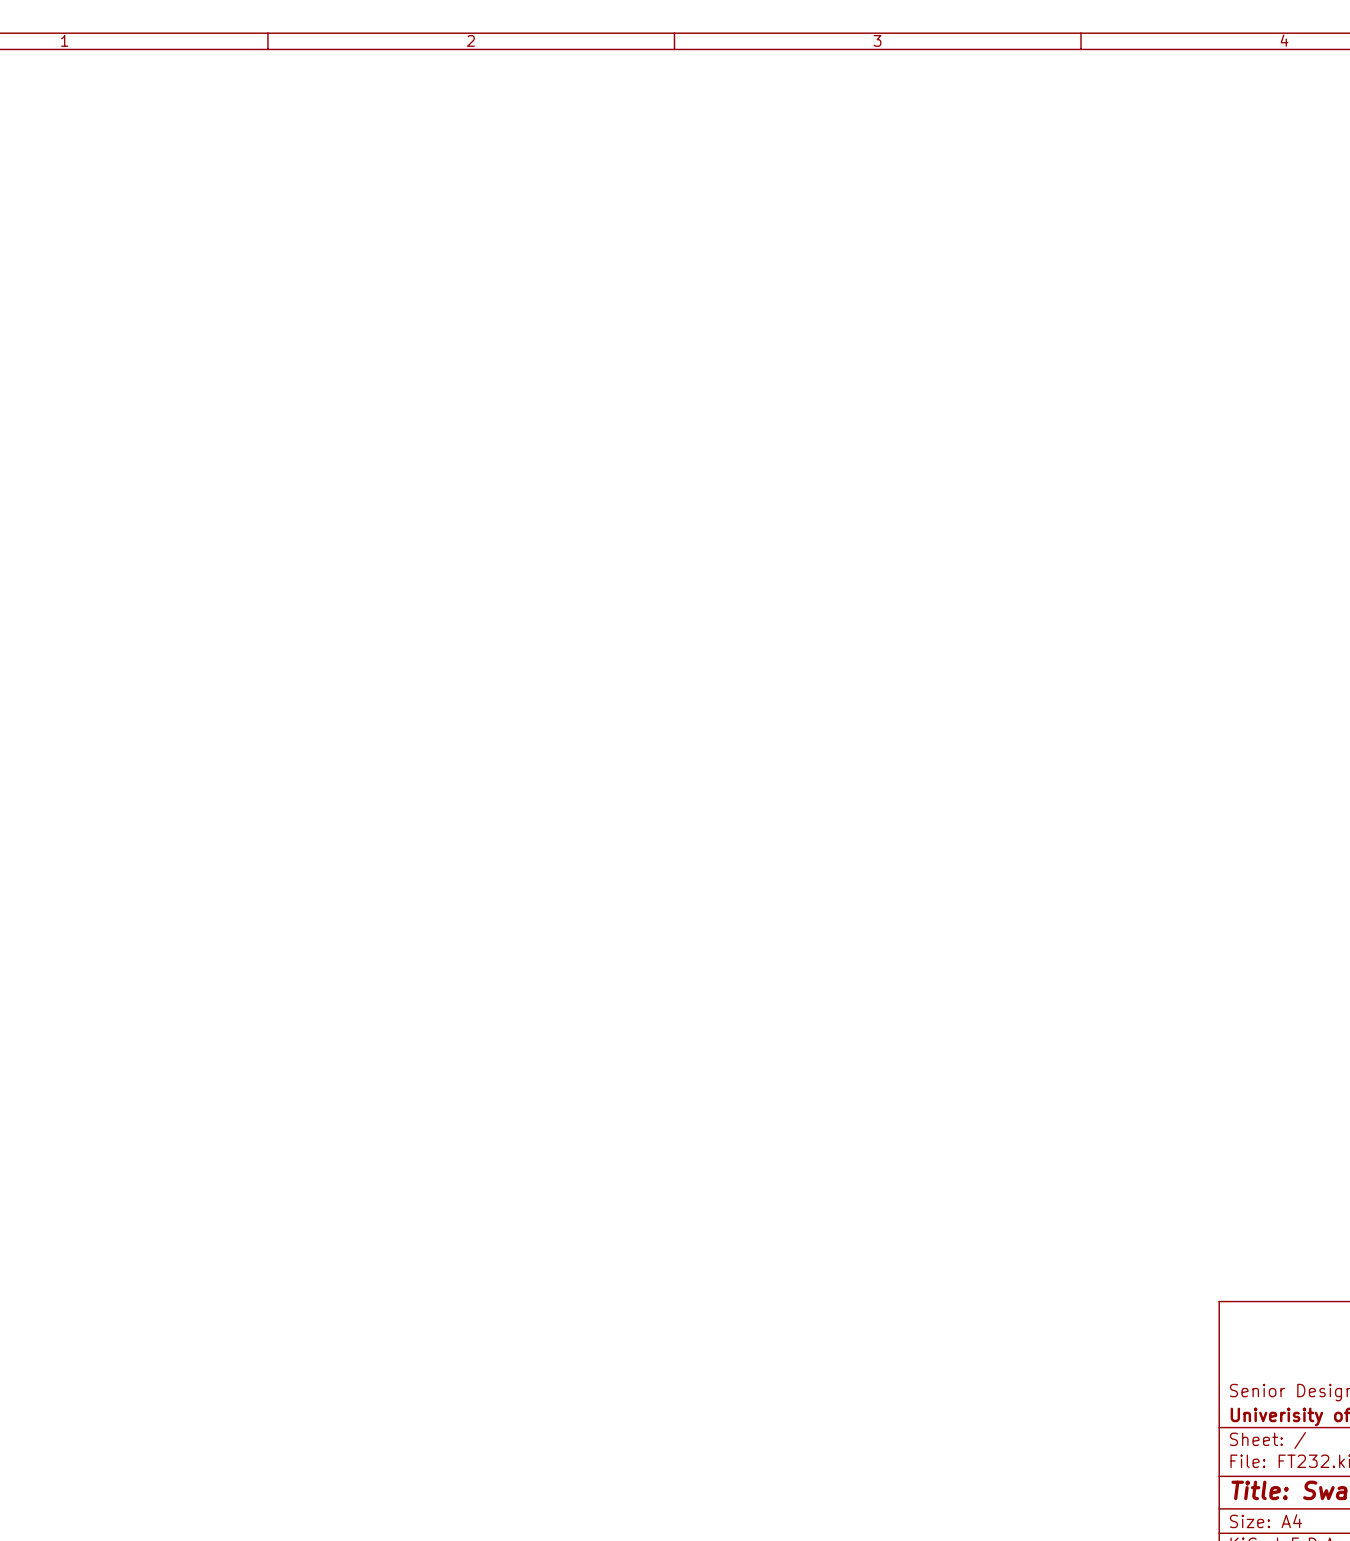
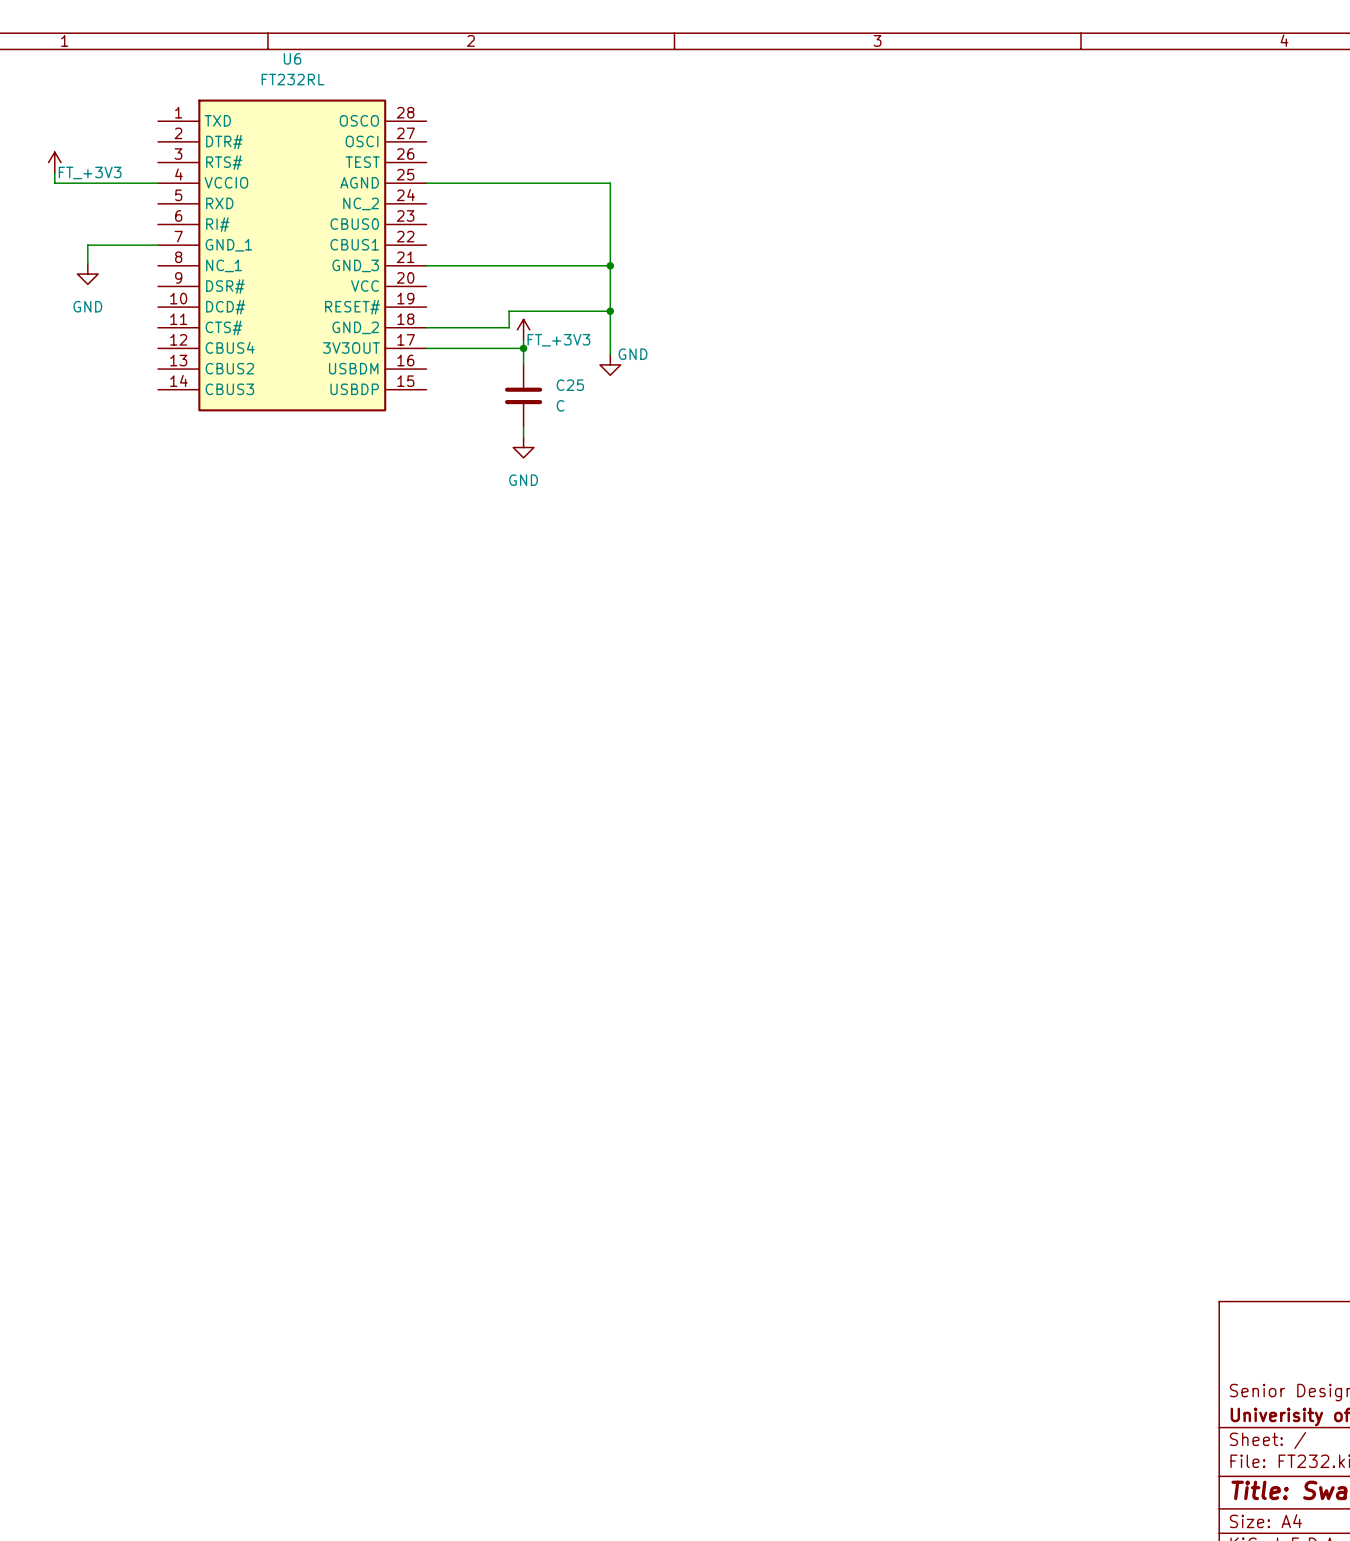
power symbol: none -> FT_+3V3 (54, 162)
wire: none -> (54, 172) (54, 183) (158, 183)
wire: none -> (426, 183) (610, 183) (610, 354)
wire: none -> (158, 245) (87, 245) (87, 263)
U6: none -> FT232RL (292, 255)
wire: none -> (426, 265) (610, 265)
junction: none -> (610, 265)
power symbol: none -> GND (87, 274)
wire: none -> (610, 311) (509, 311) (509, 327) (426, 327)
junction: none -> (610, 311)
power symbol: none -> FT_+3V3 (523, 329)
wire: none -> (523, 340) (523, 364)
wire: none -> (426, 348) (523, 348)
junction: none -> (523, 348)
power symbol: none -> GND (610, 364)
C25: none -> C (523, 395)
wire: none -> (523, 426) (523, 437)
power symbol: none -> GND (523, 447)

